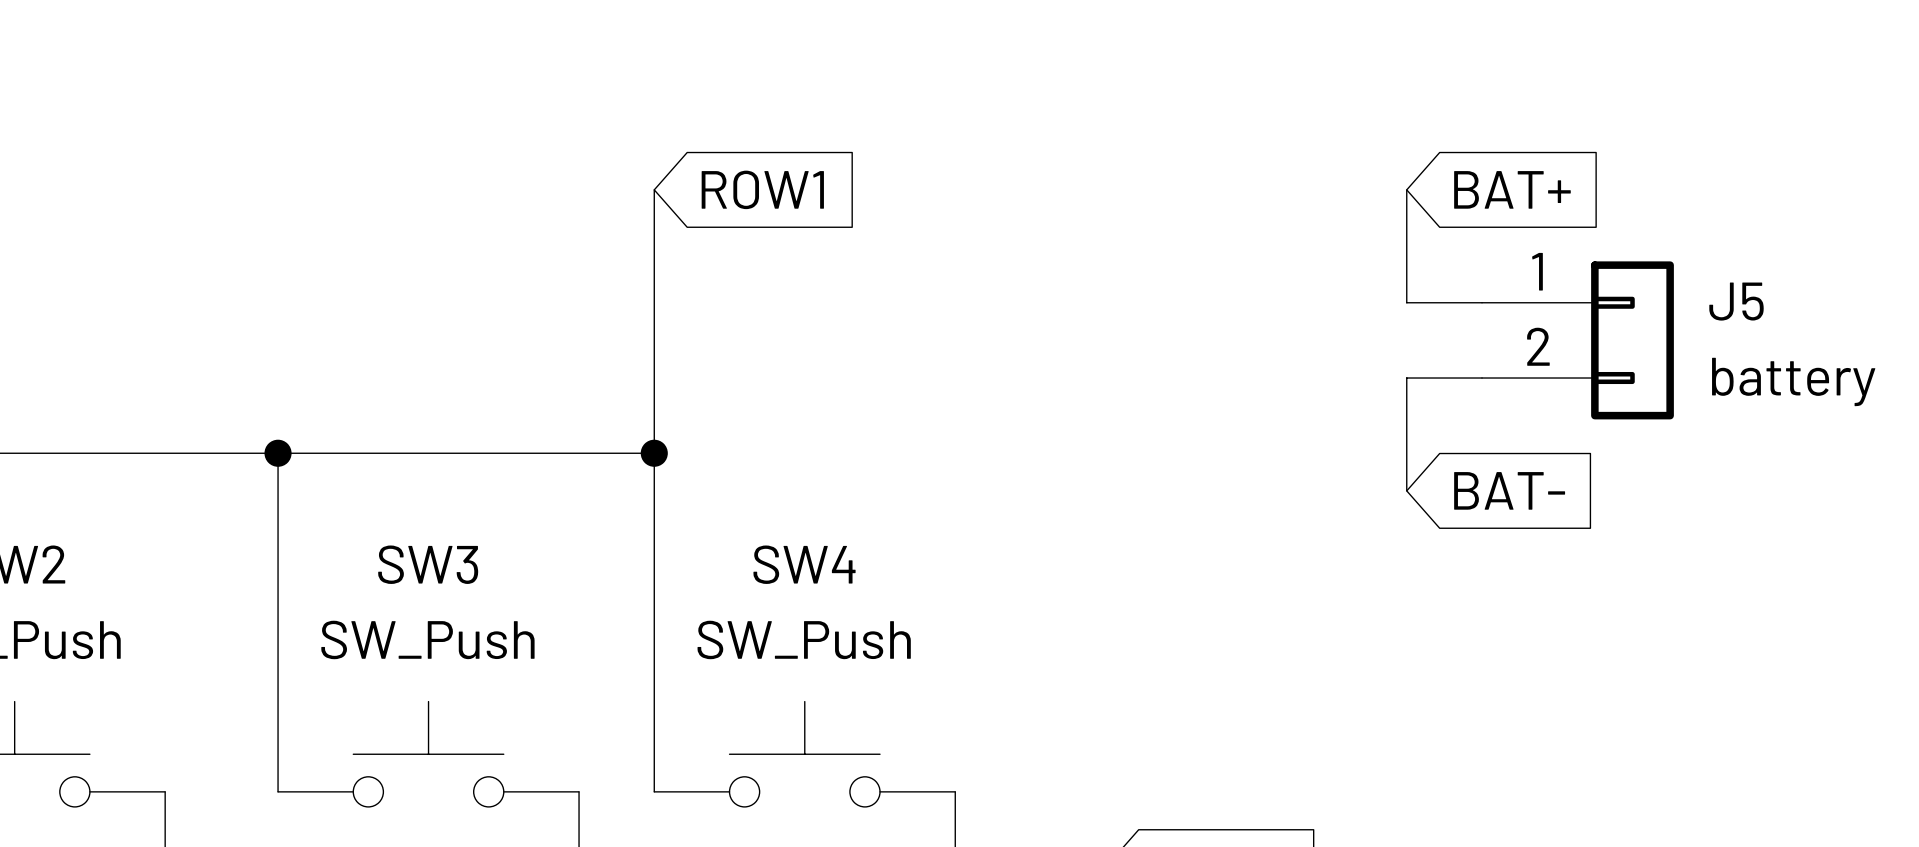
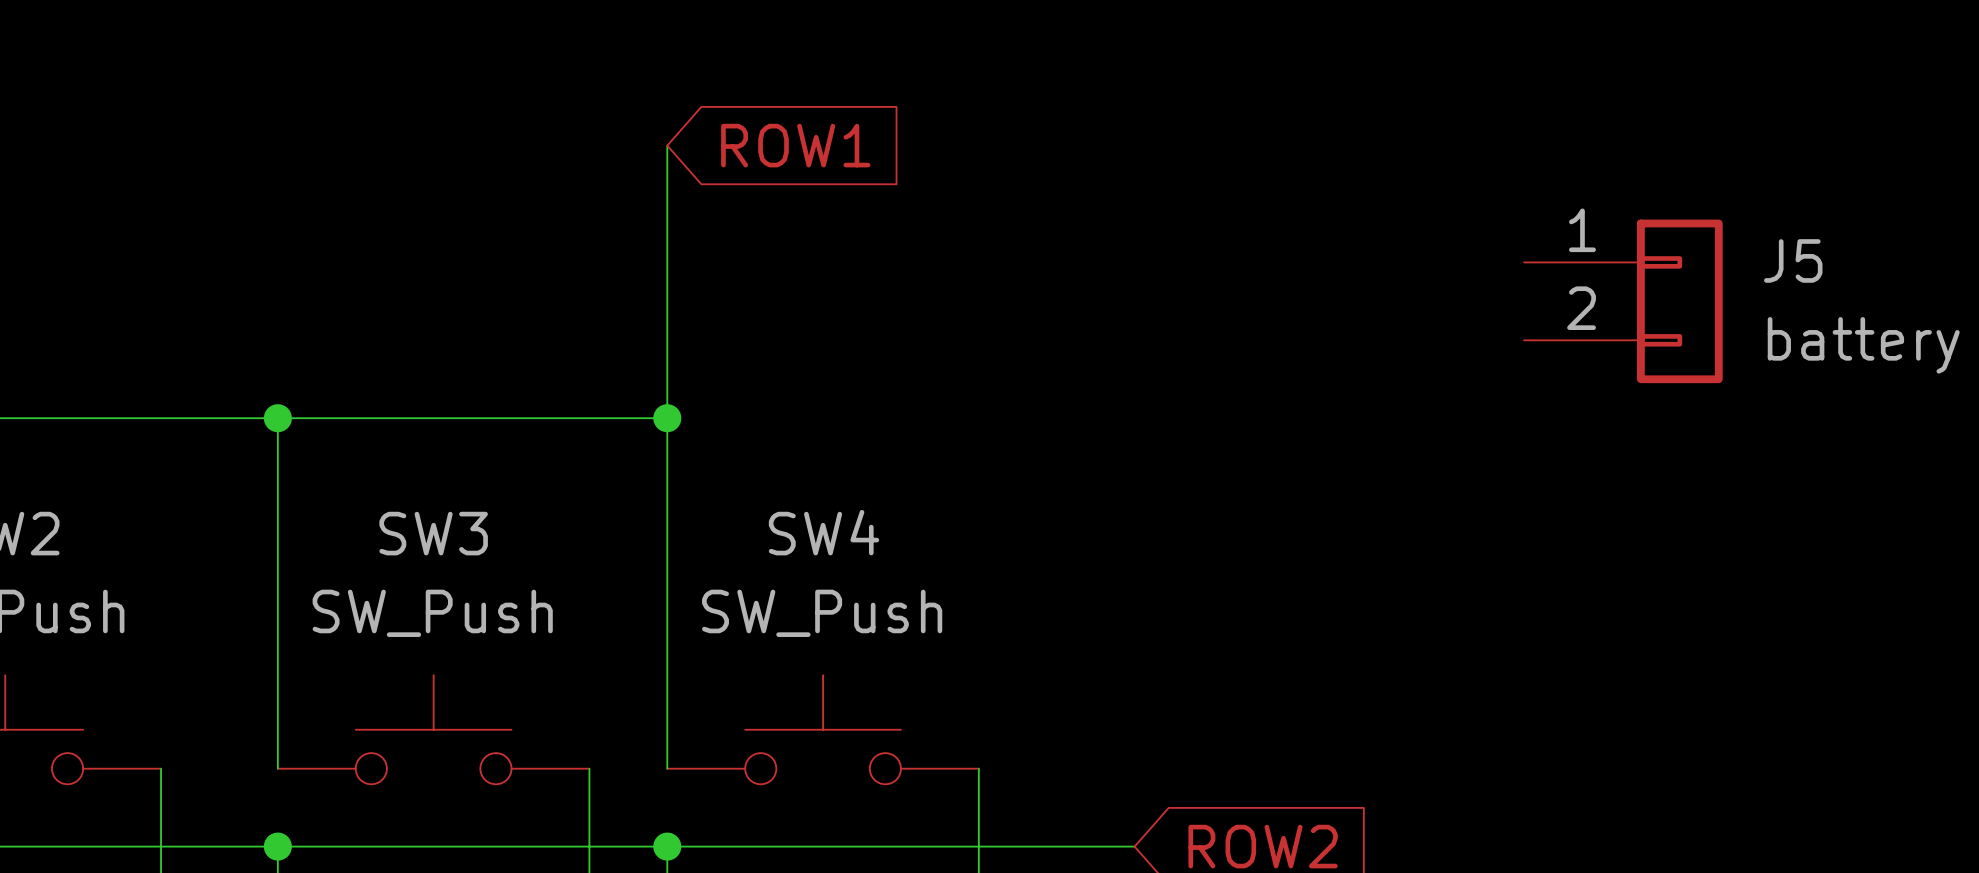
wire: (1406, 189) (1406, 302) (1482, 302) -> none
global label: BAT+ (1512, 189) -> none
wire: (1482, 378) (1406, 378) (1406, 490) -> none
global label: BAT- (1509, 490) -> none

